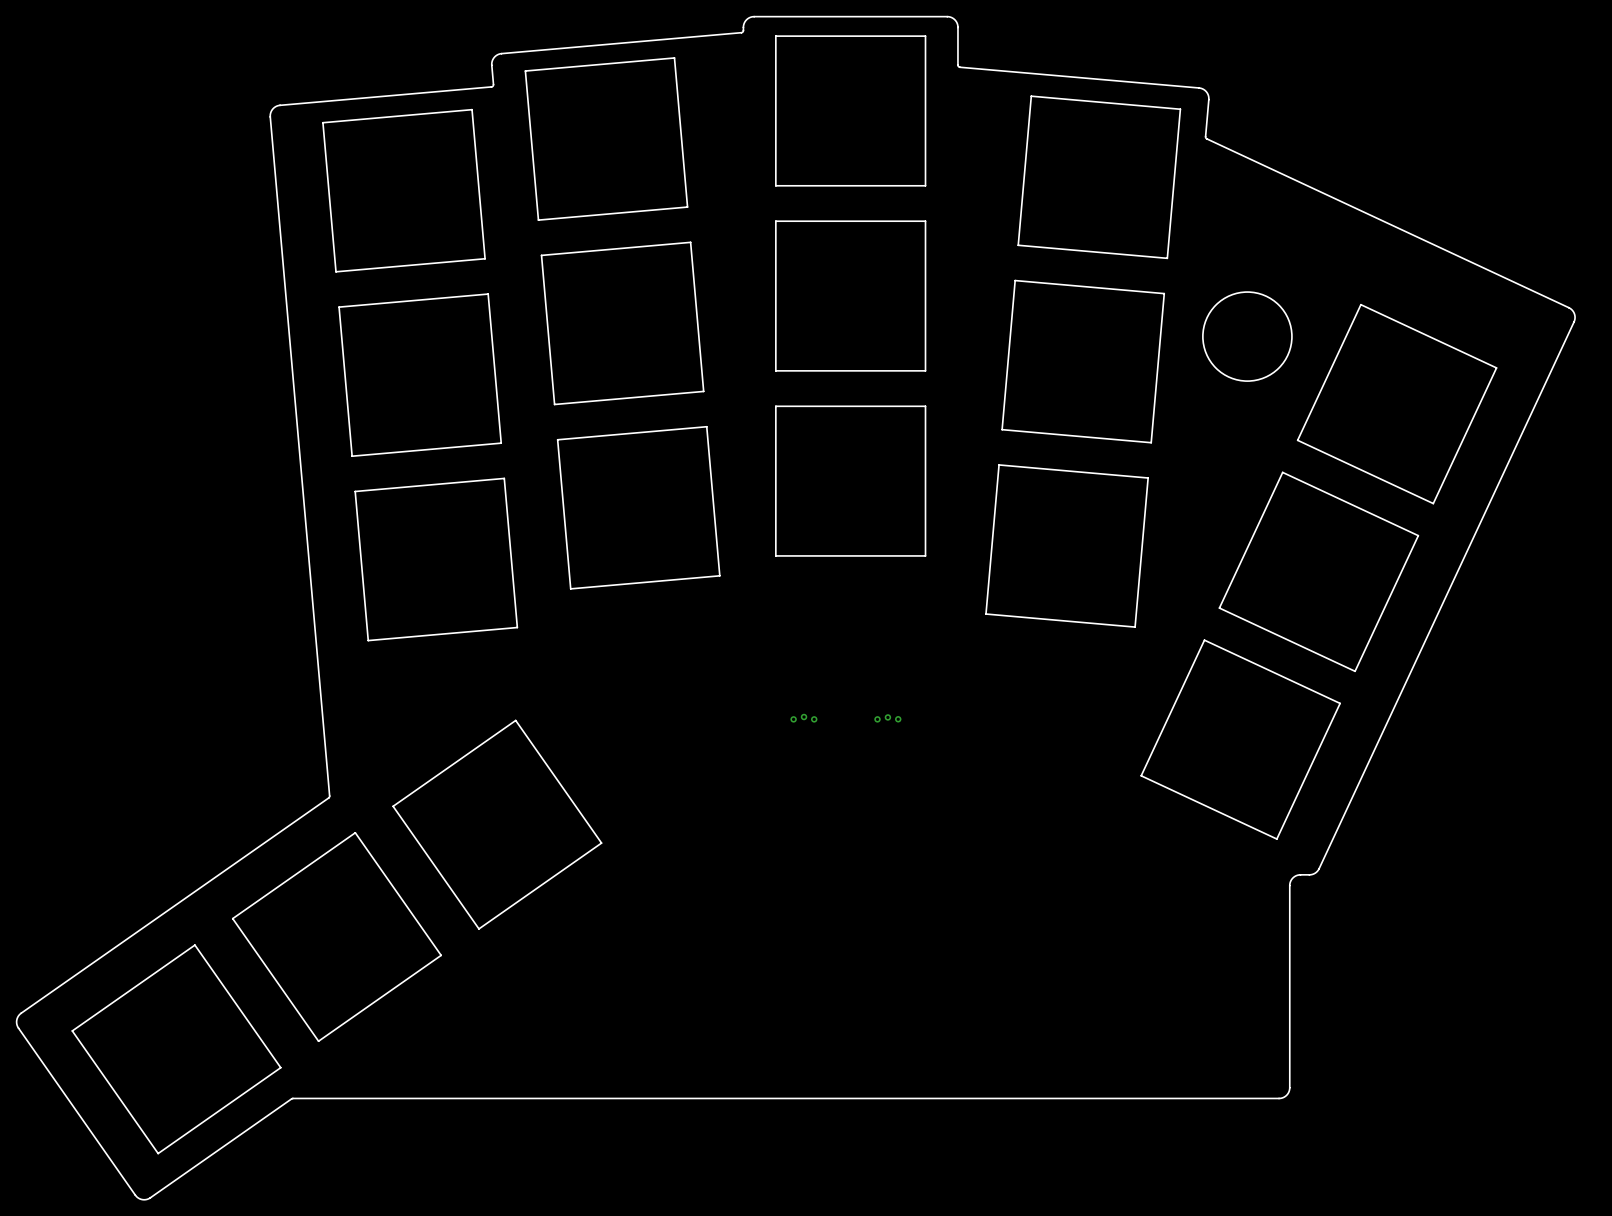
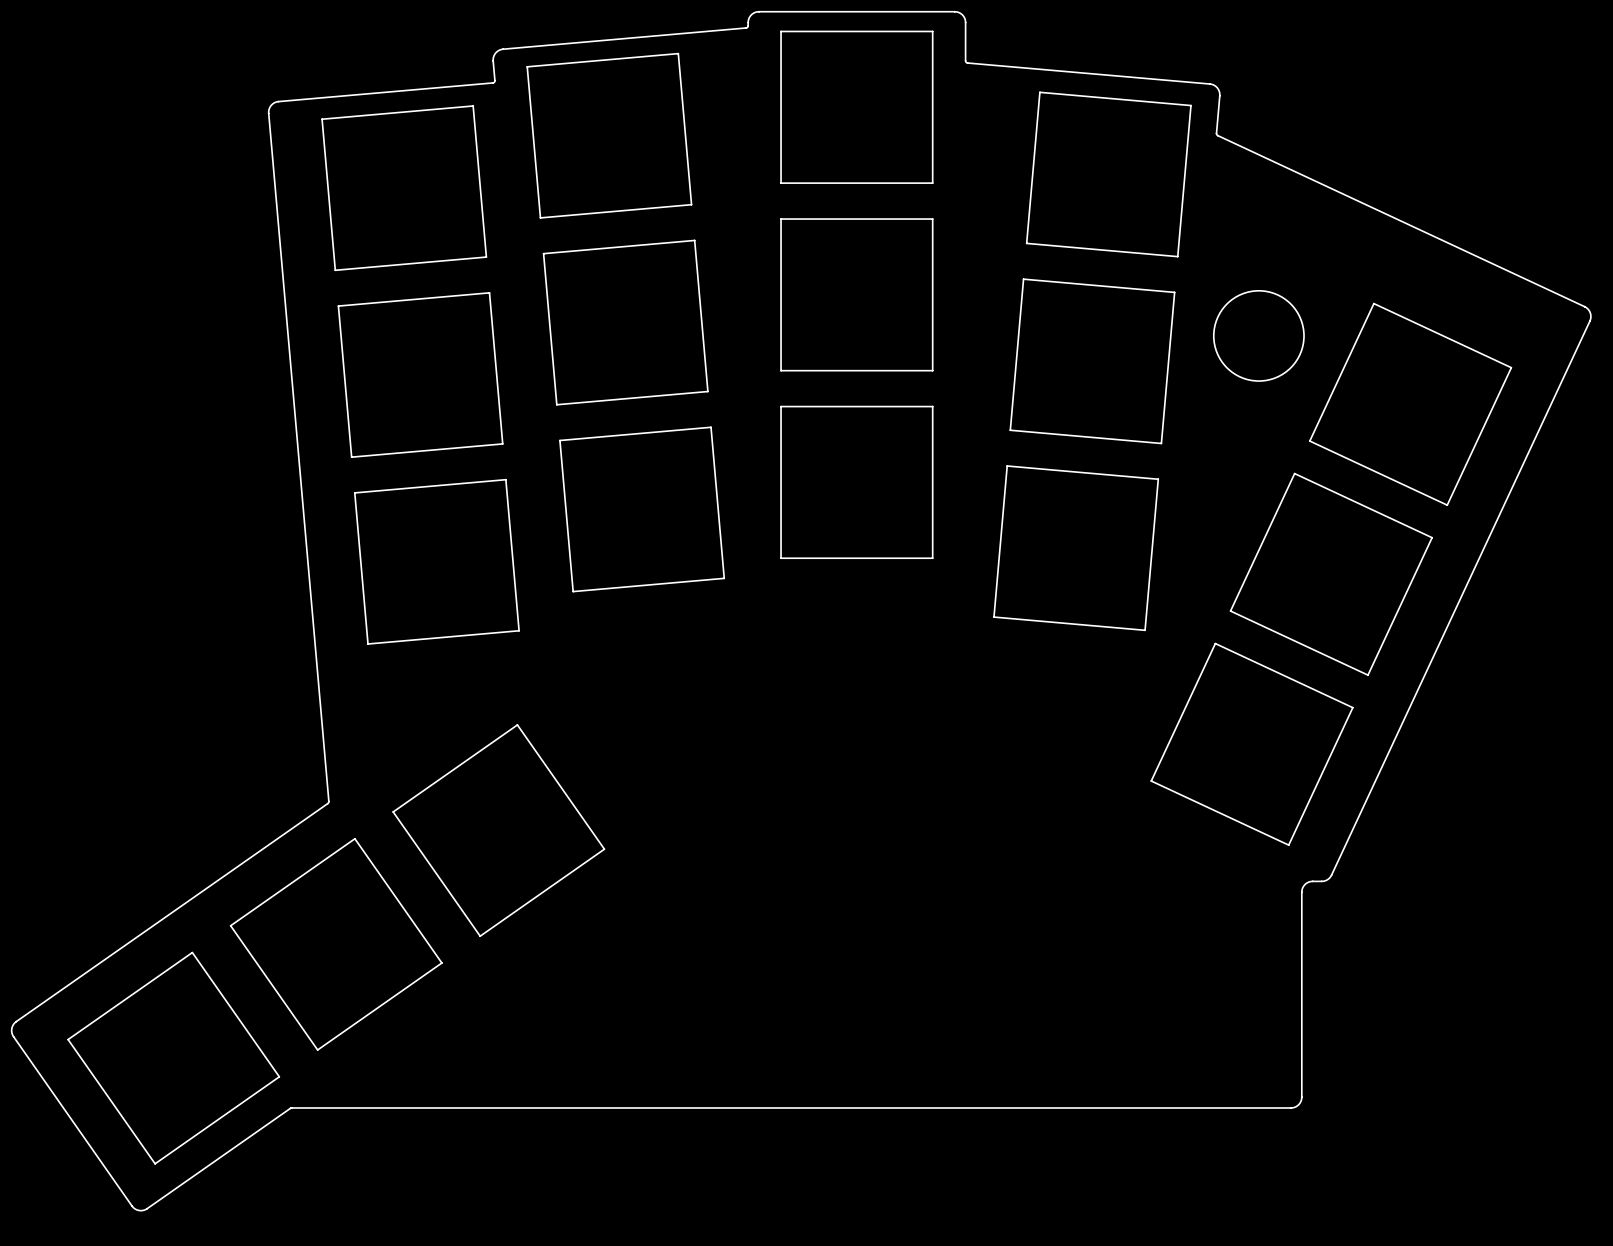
via: (804, 717) -> none
via: (887, 717) -> none
via: (793, 719) -> none
via: (814, 719) -> none
via: (877, 719) -> none
via: (898, 719) -> none

